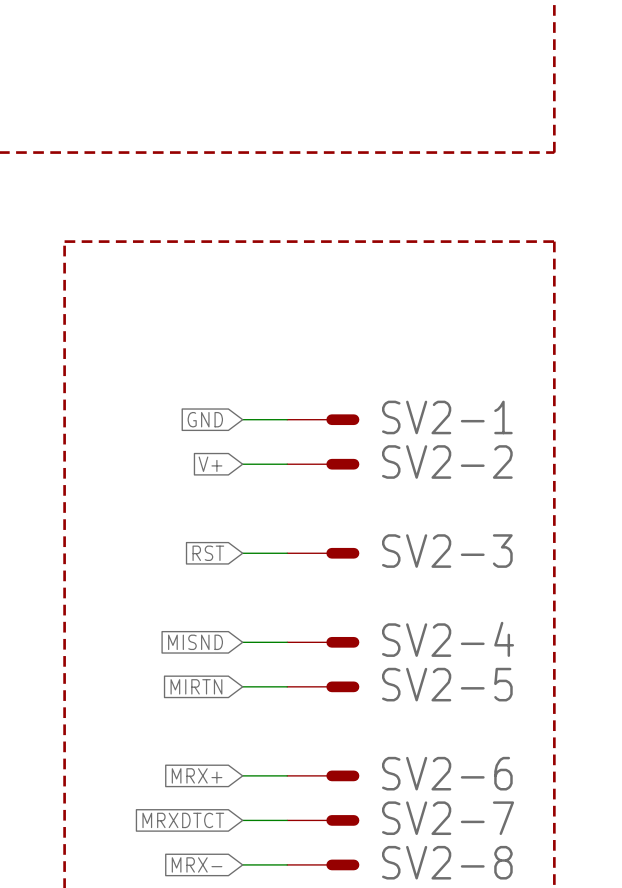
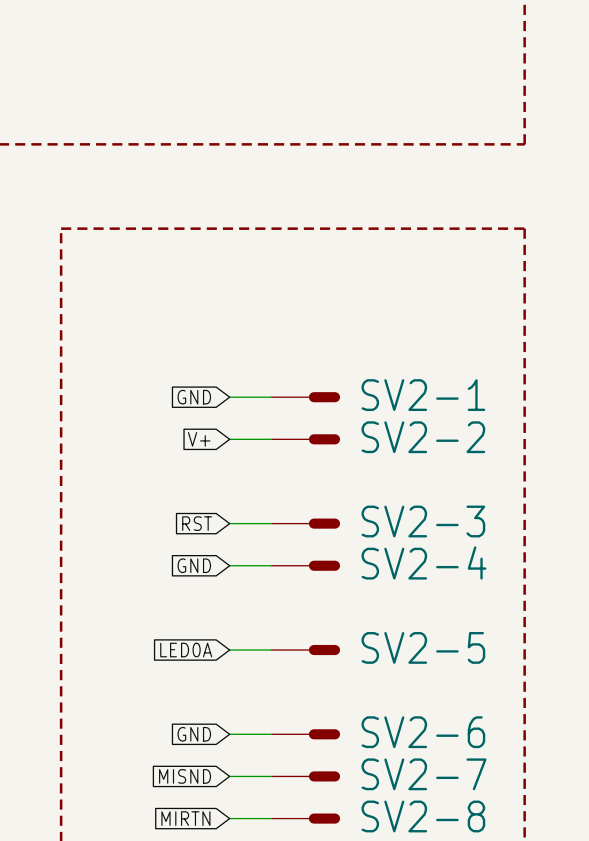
global label: none -> GND (194, 565)
global label: MISND (195, 642) -> none
wire: (242, 642) (287, 642) -> (229, 565) (271, 565)
SV2-4 position: (323, 642) -> (305, 565)
global label: MIRTN (196, 686) -> LED0A (186, 650)
global label: MRX+ (197, 775) -> GND (194, 734)
global label: MRXDTCT (183, 820) -> MISND (185, 776)
global label: MRX- (197, 864) -> MIRTN (185, 818)

